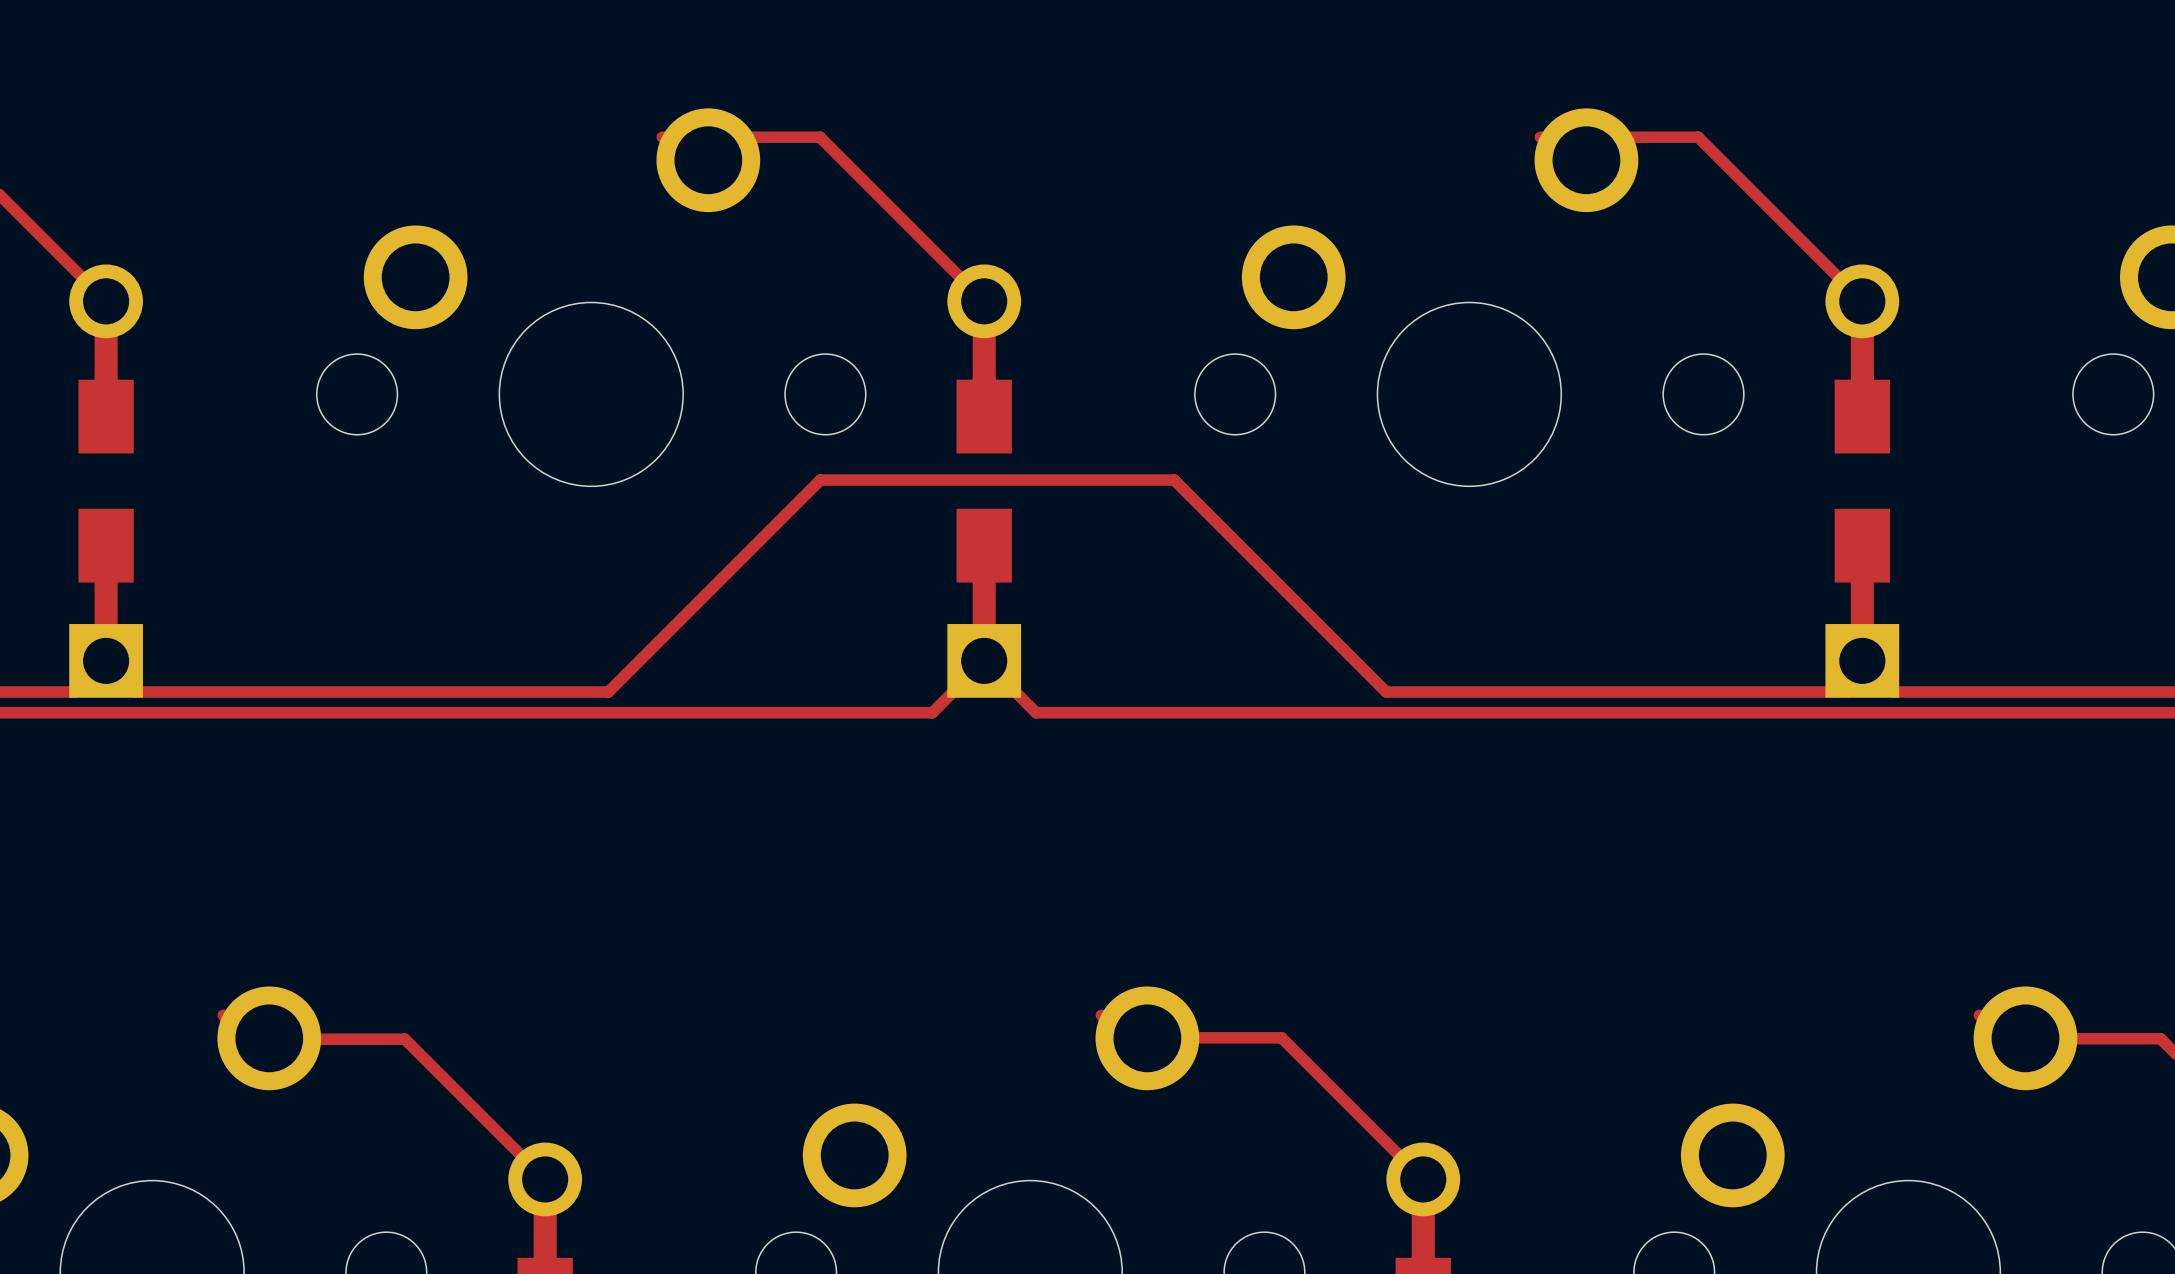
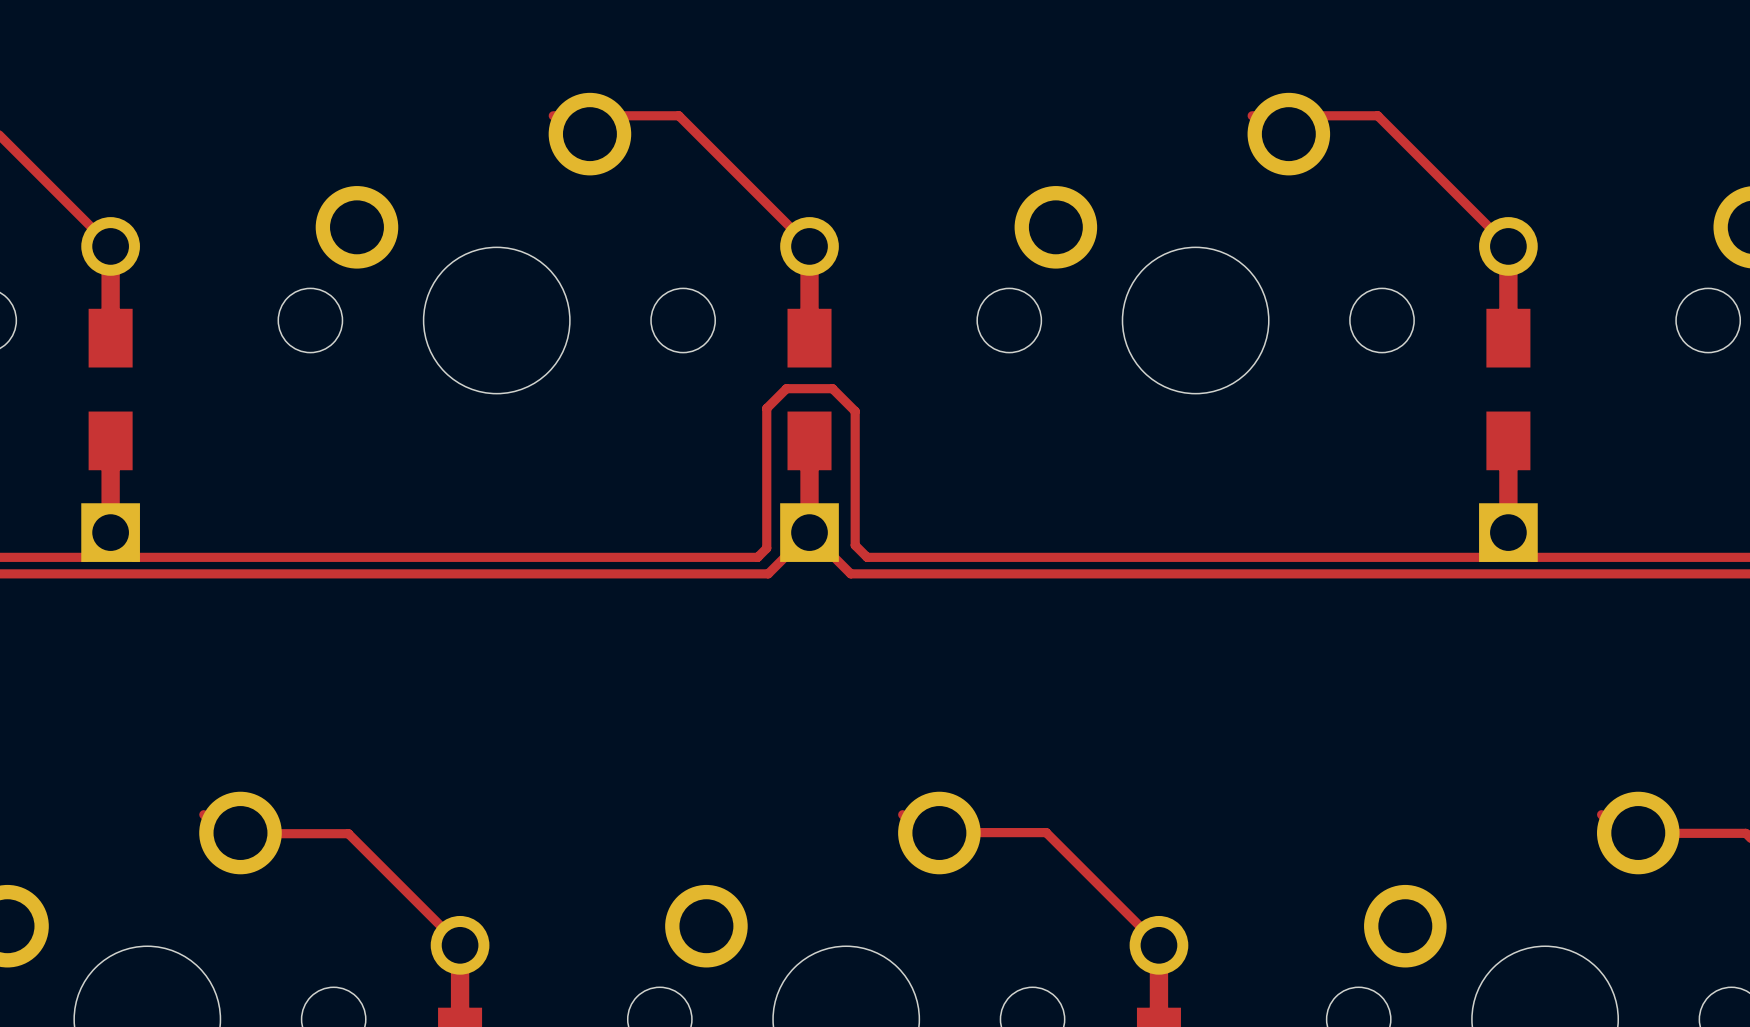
track: (955, 480) (820, 480) (608, 692) -> (786, 388) (766, 408) (766, 548) (757, 557) (510, 557)
track: (1013, 480) (1174, 480) (1386, 692) -> (832, 388) (855, 411) (855, 545) (867, 557) (1129, 557)

